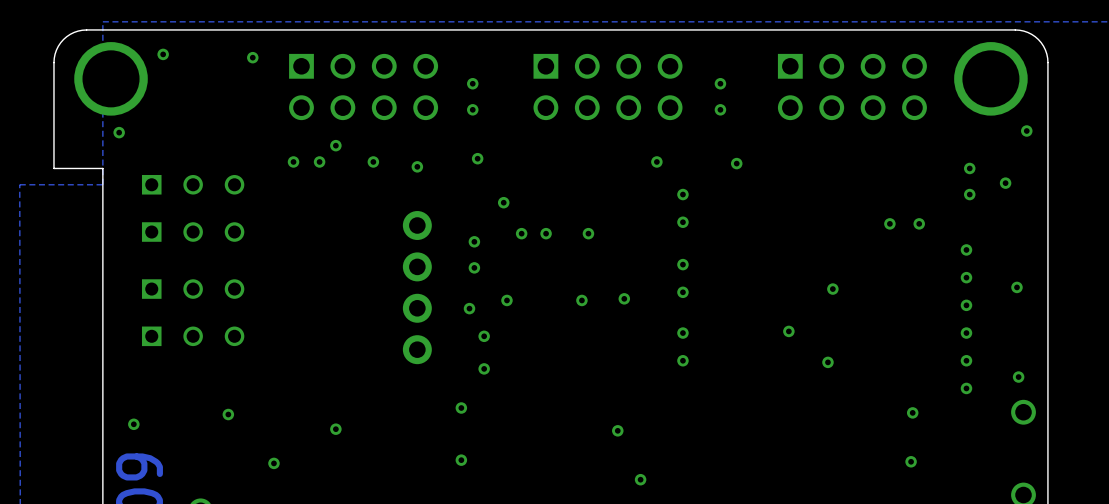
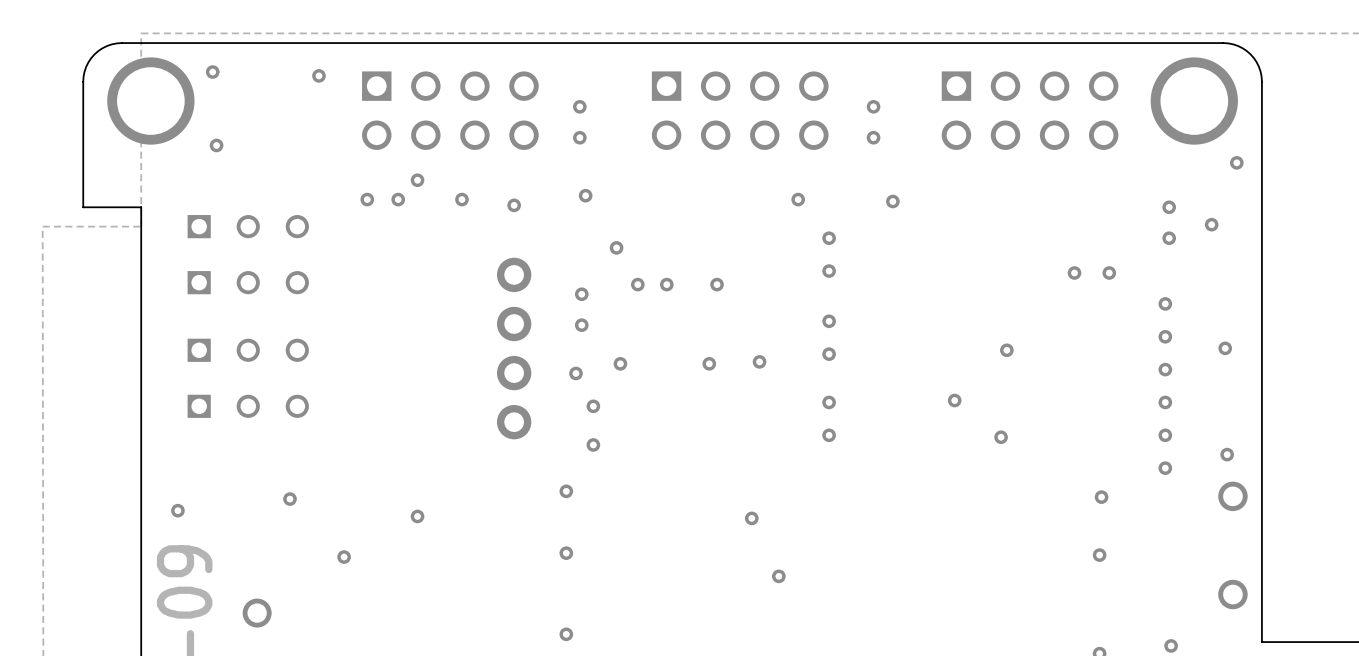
via position: (119, 132) -> (216, 145)

